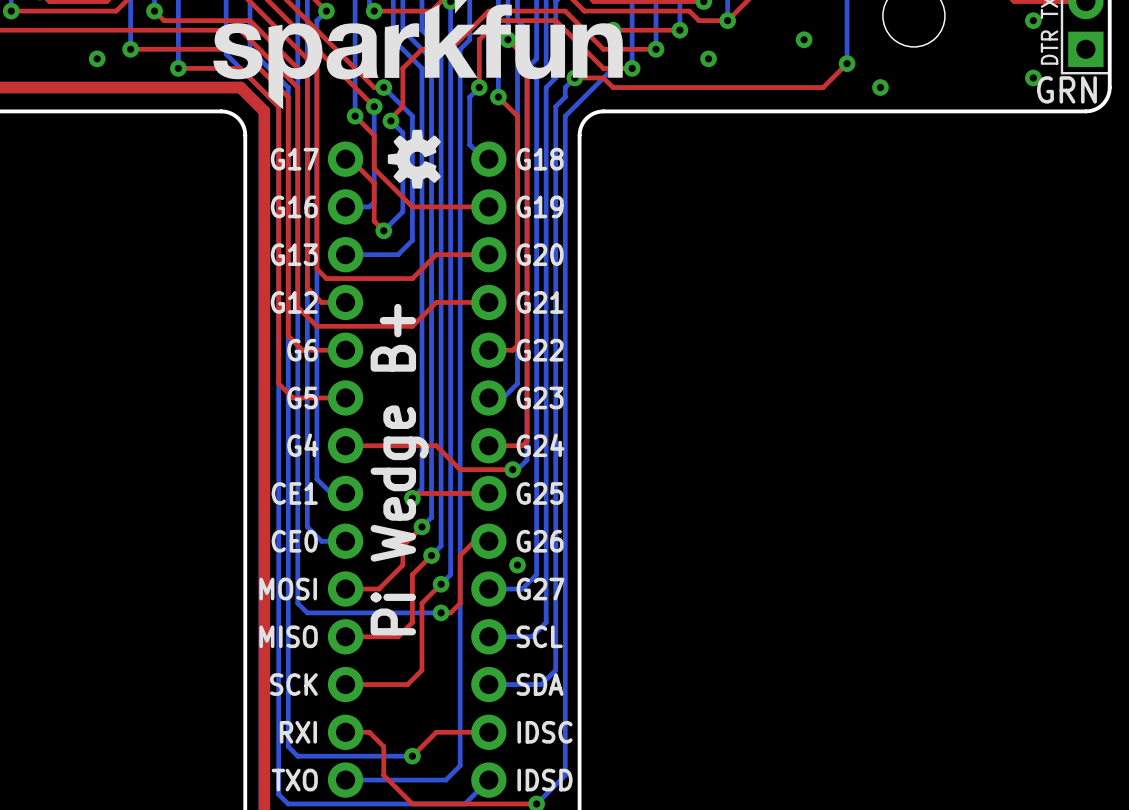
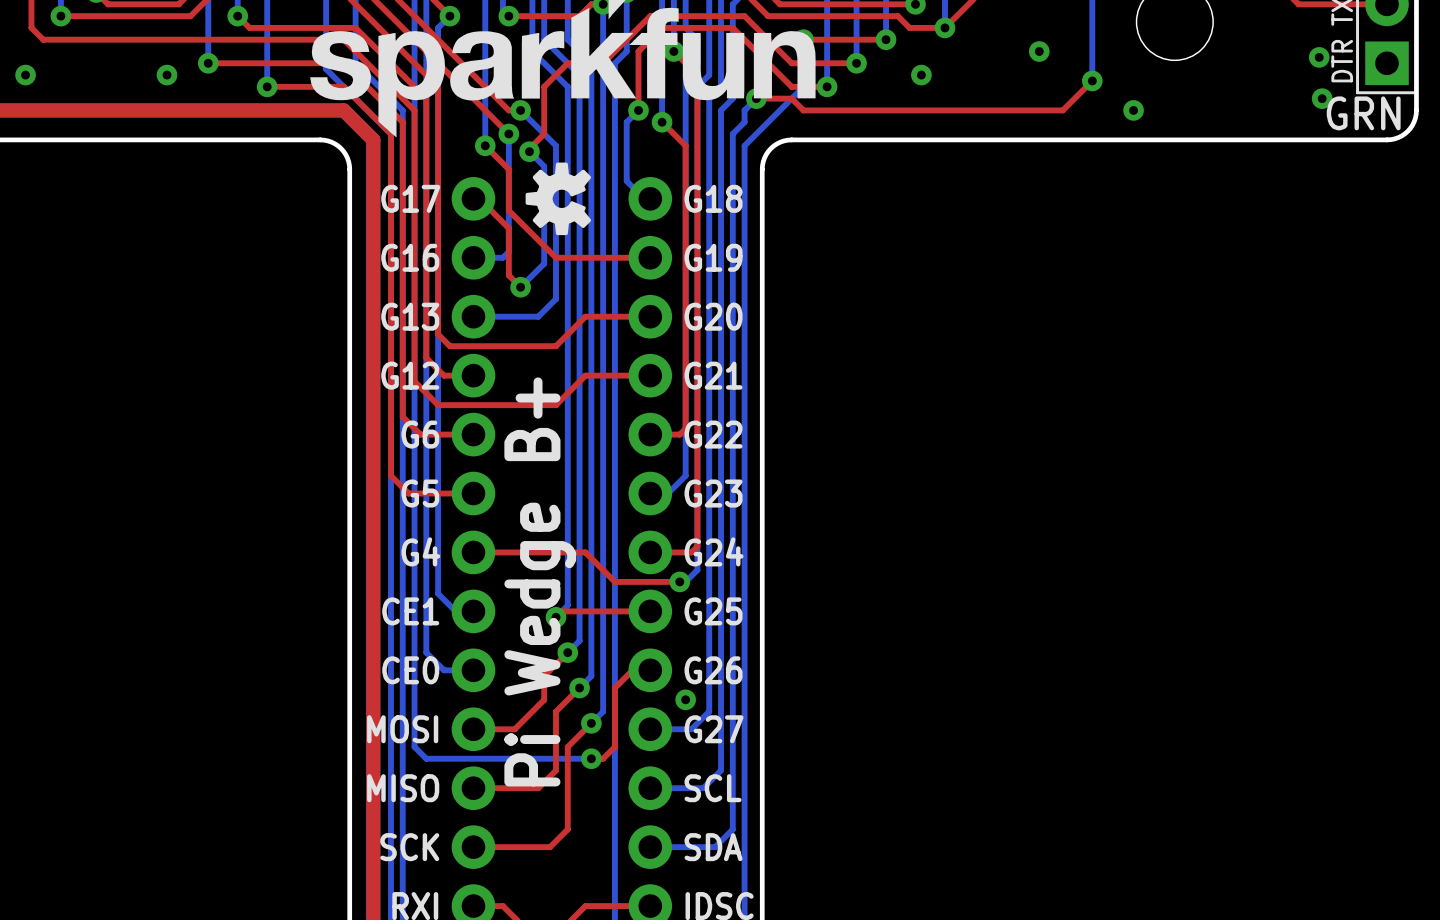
via: (1033, 20) -> none
via: none -> (1319, 57)

